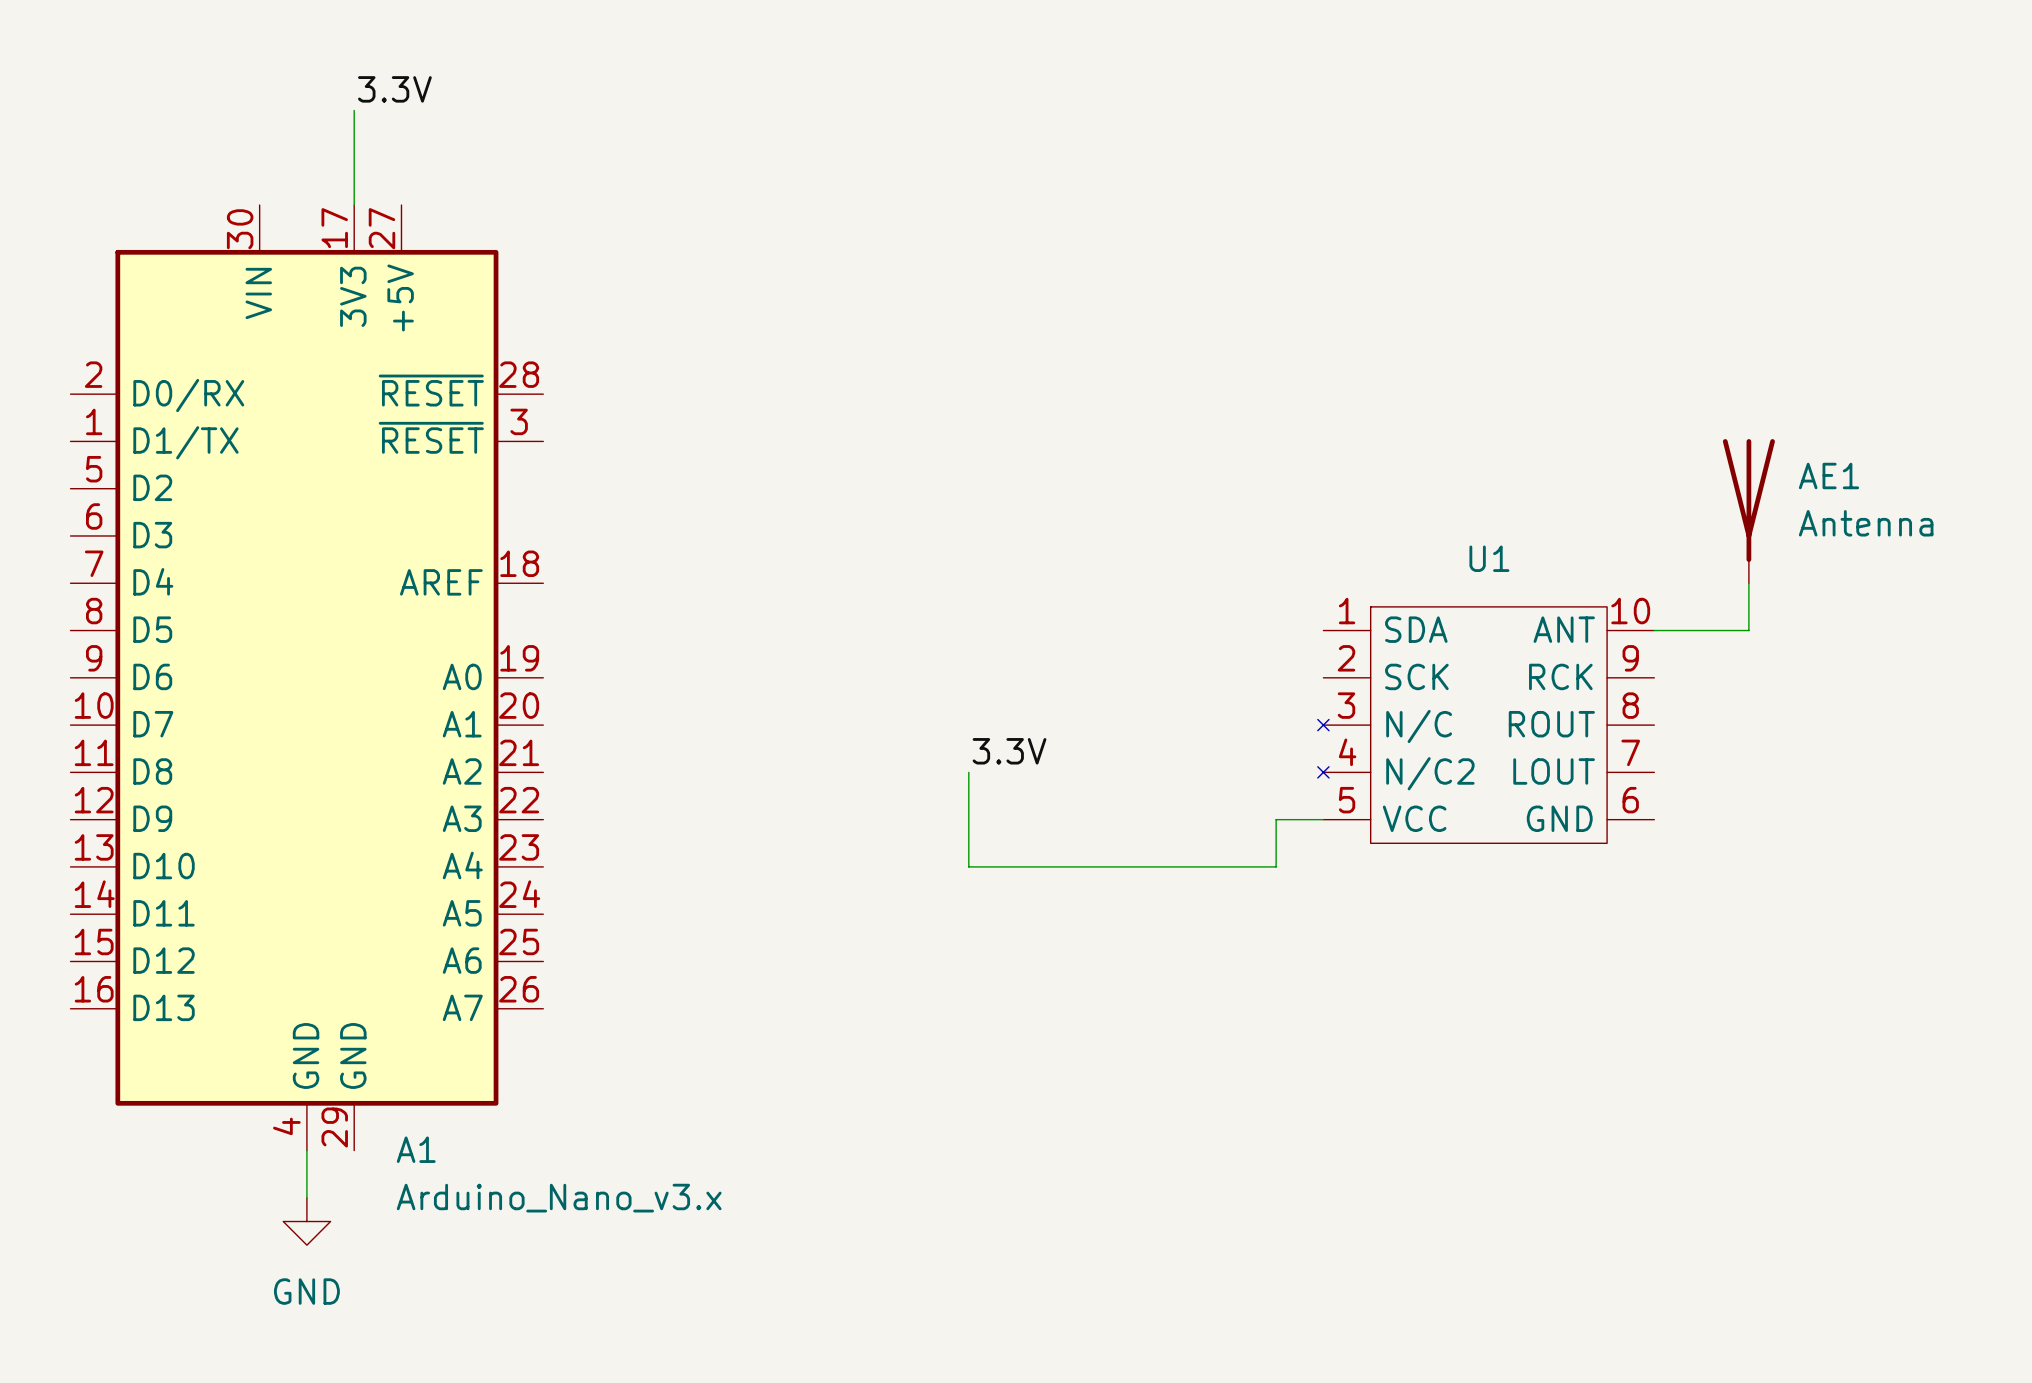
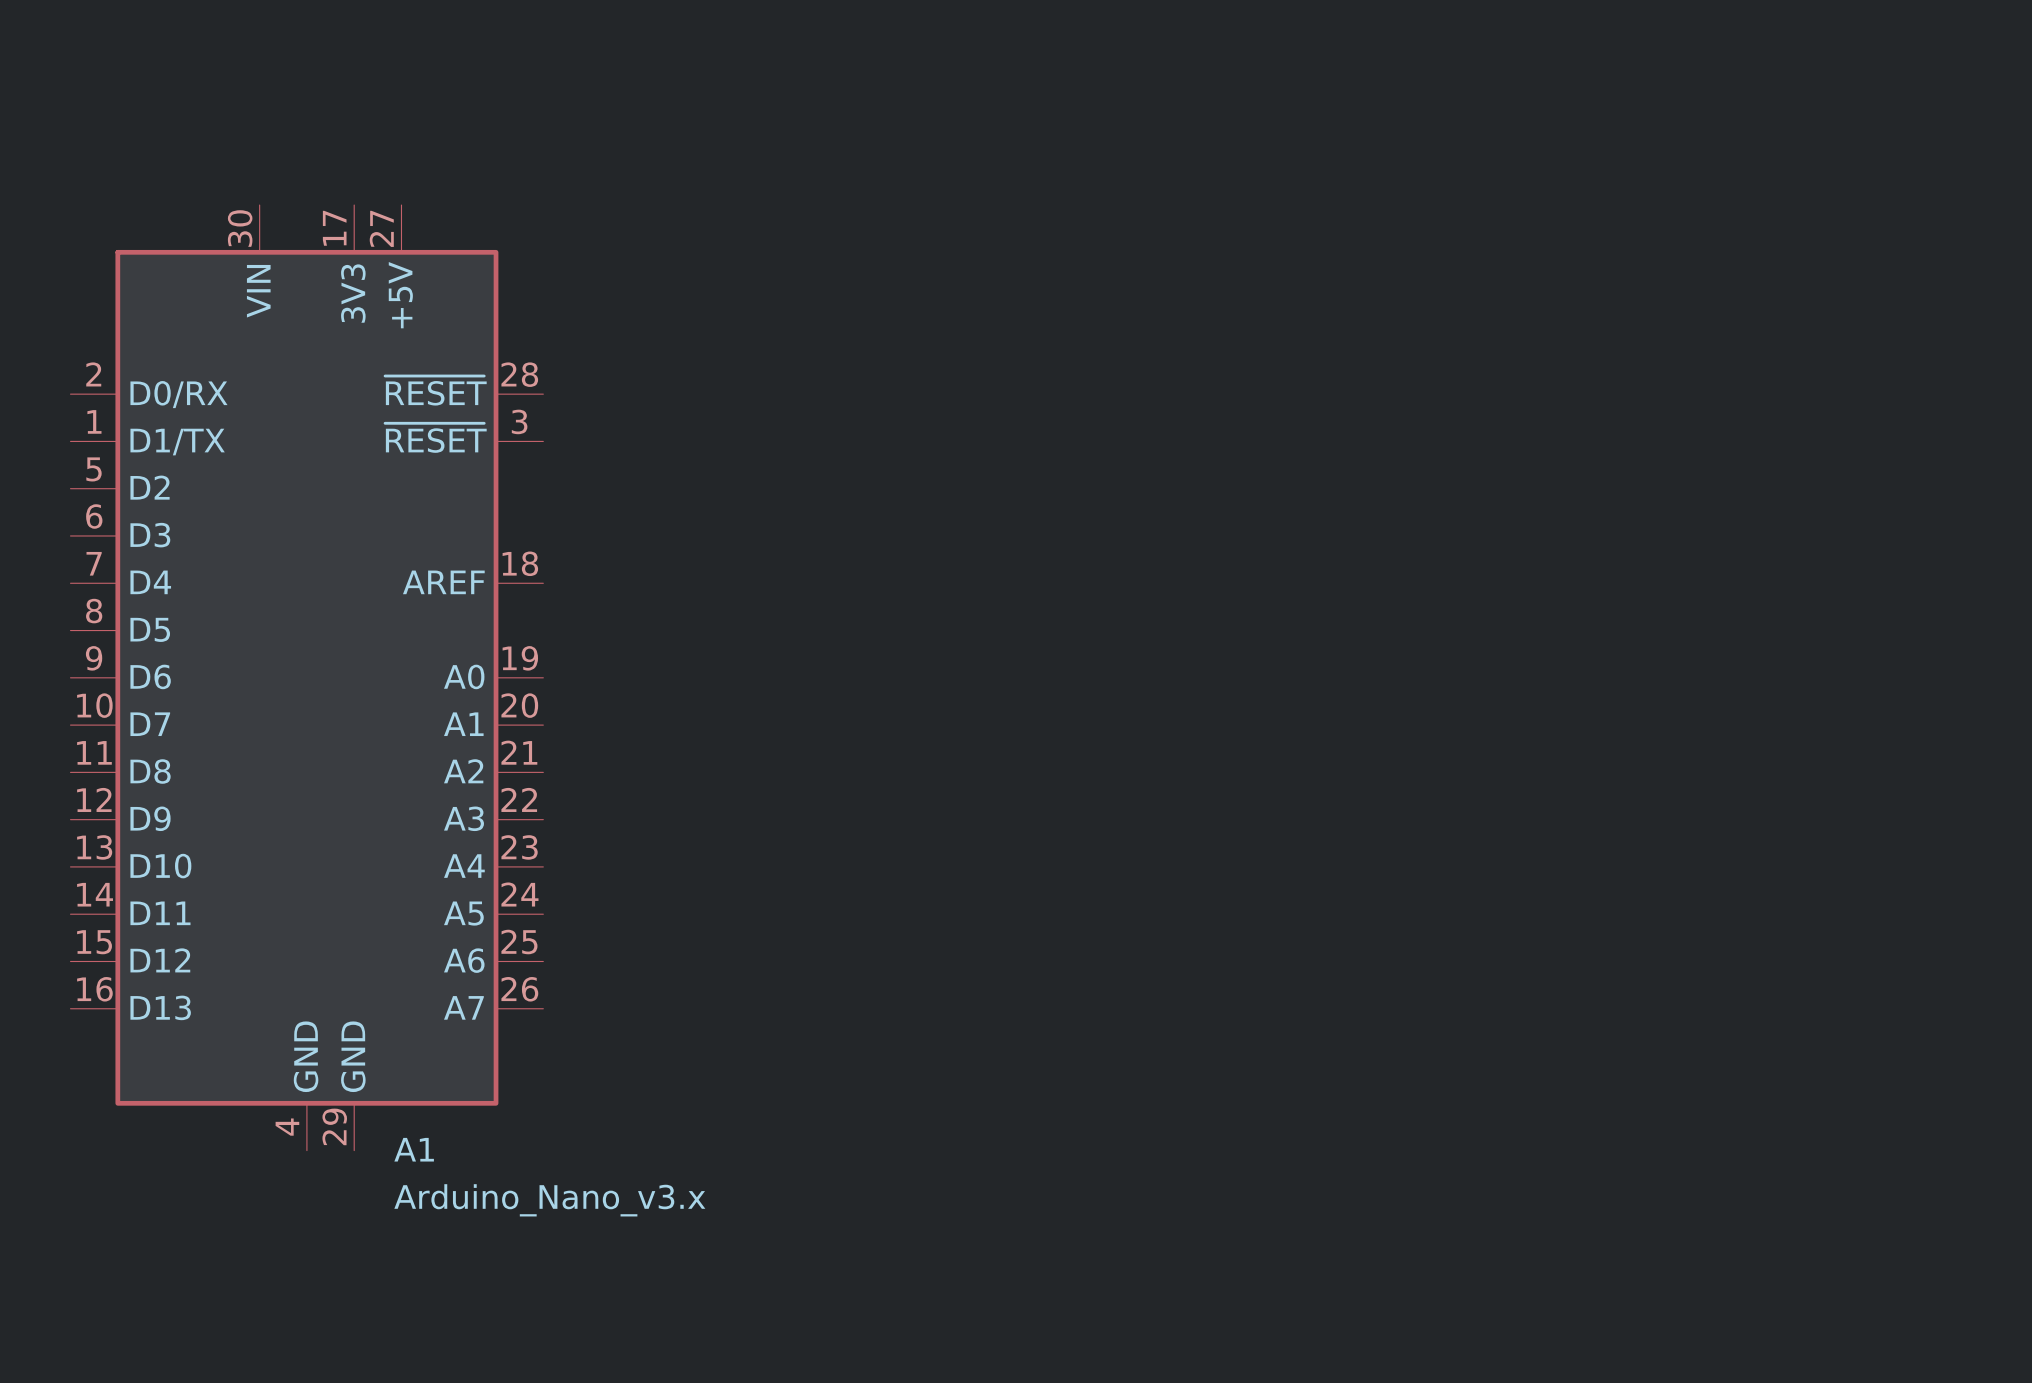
label: 3.3V (394, 89) -> none
wire: (354, 110) (354, 205) -> none
AE1: Antenna (1748, 511) -> none
wire: (1748, 583) (1748, 630) (1654, 630) -> none
U1: (1486, 725) -> none
label: 3.3V (1009, 751) -> none
wire: (968, 772) (968, 866) (1276, 866) (1276, 819) (1323, 819) -> none
wire: (306, 1150) (306, 1197) -> none
power symbol: GND (306, 1221) -> none

